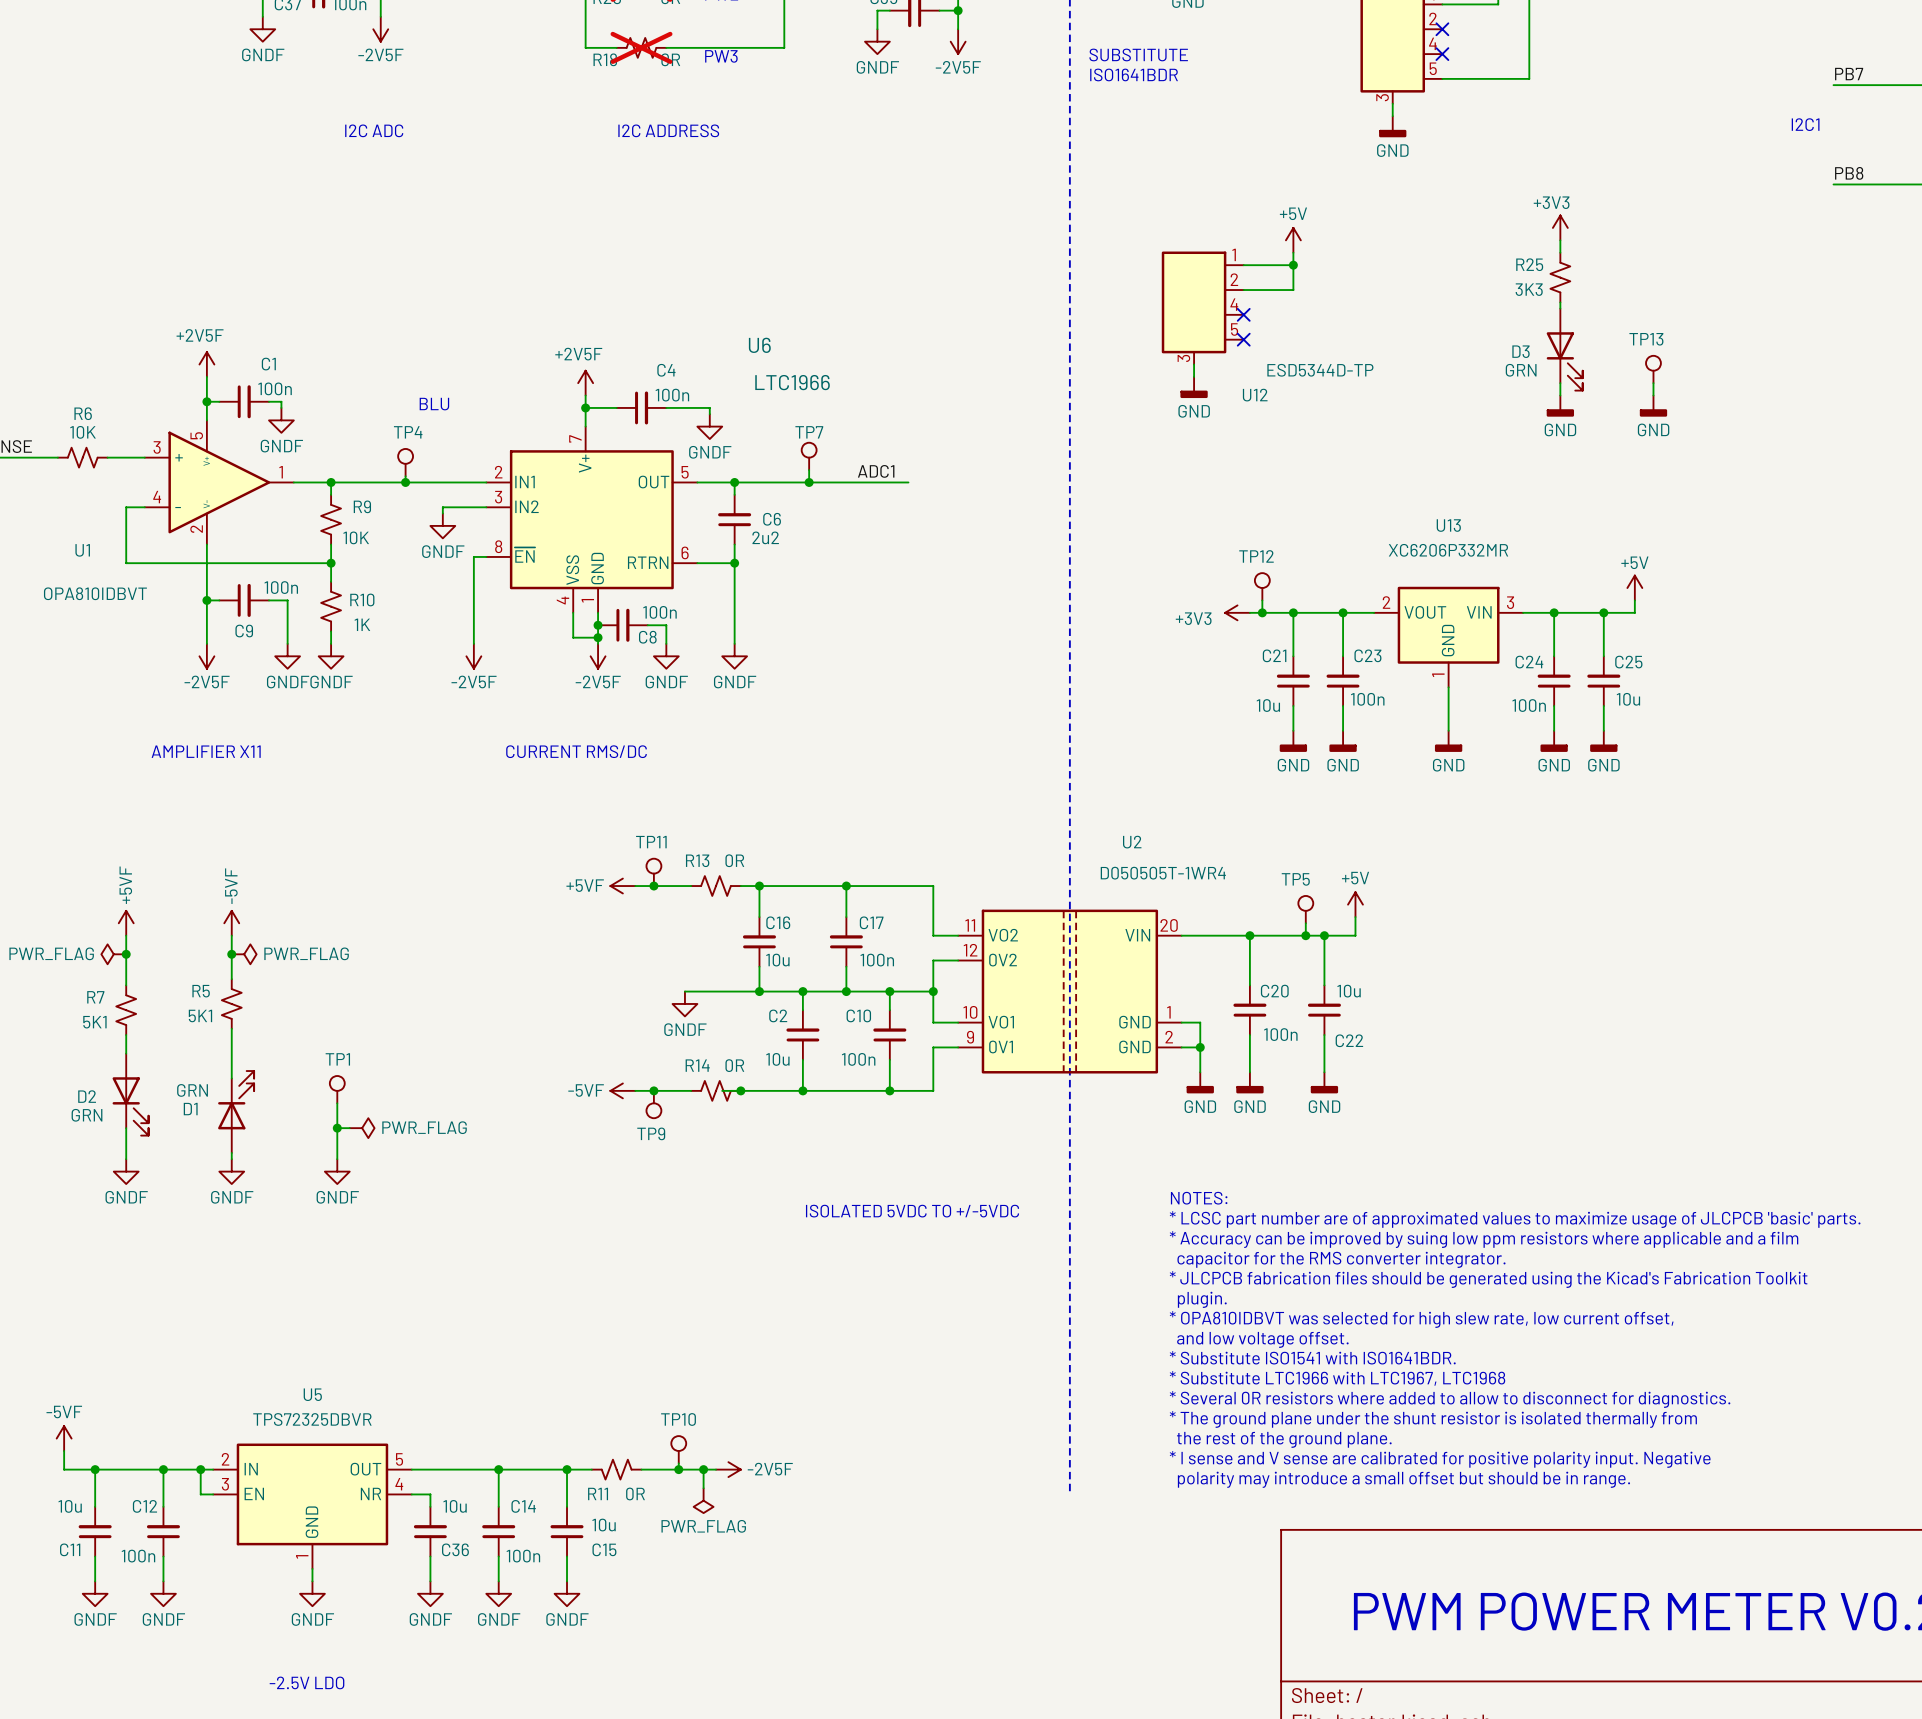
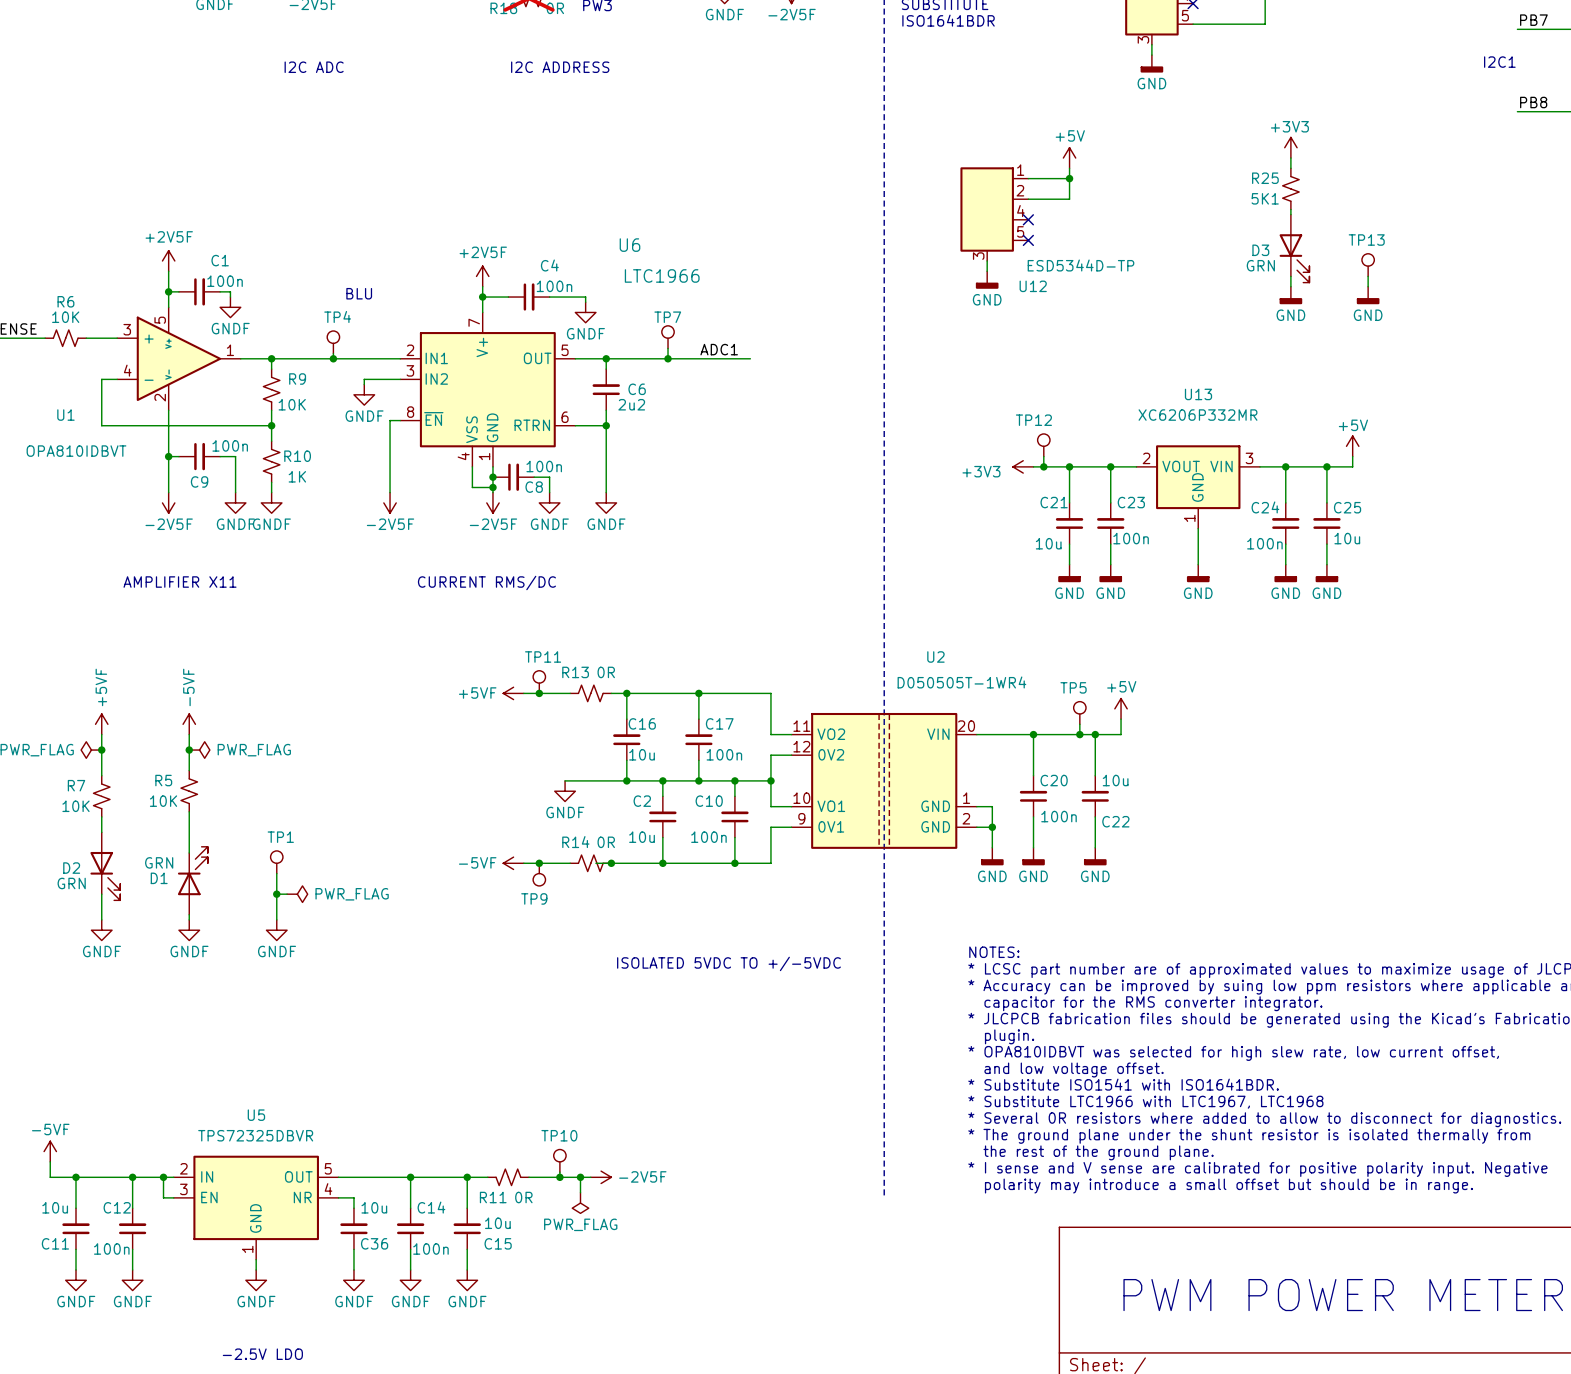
R25 value: 3K3 (1529, 289) -> 5K1 (1265, 198)
R5 value: 5K1 (200, 1015) -> 10K (163, 801)
R7 value: 5K1 (94, 1022) -> 10K (76, 806)

